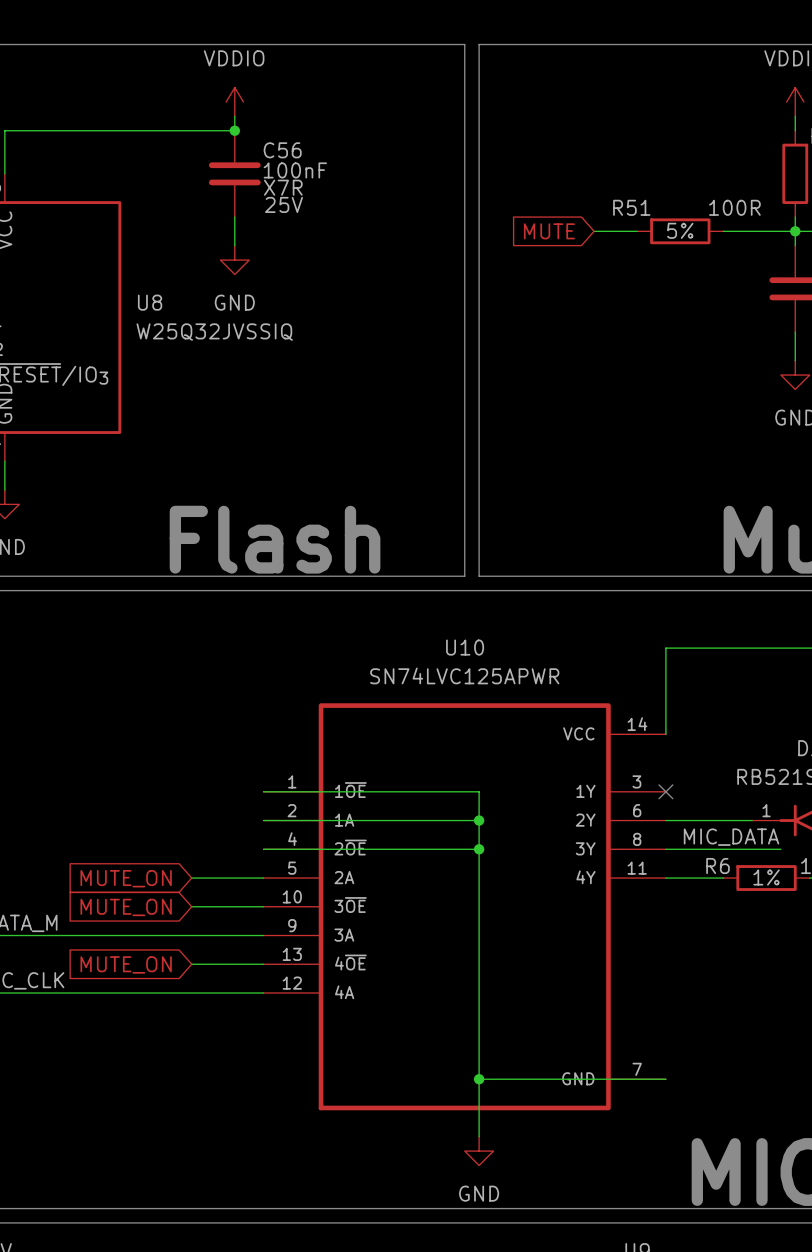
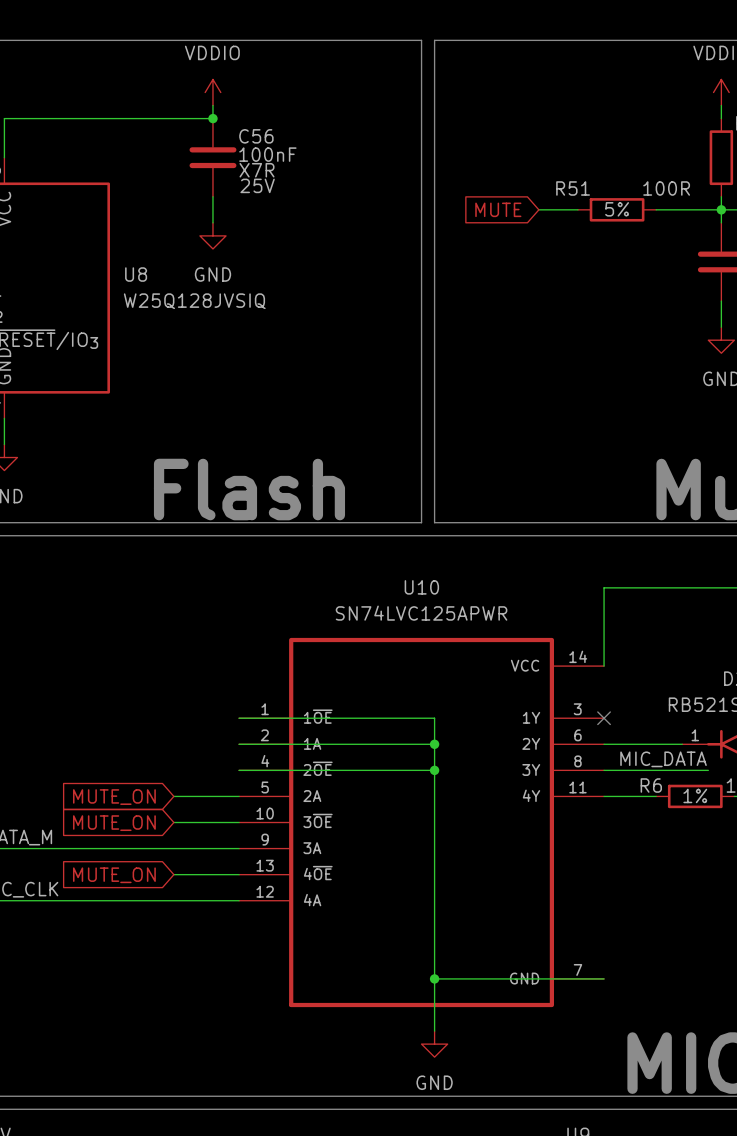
U8 value: W25Q32JVSSIQ (214, 332) -> W25Q128JVSIQ (194, 301)

